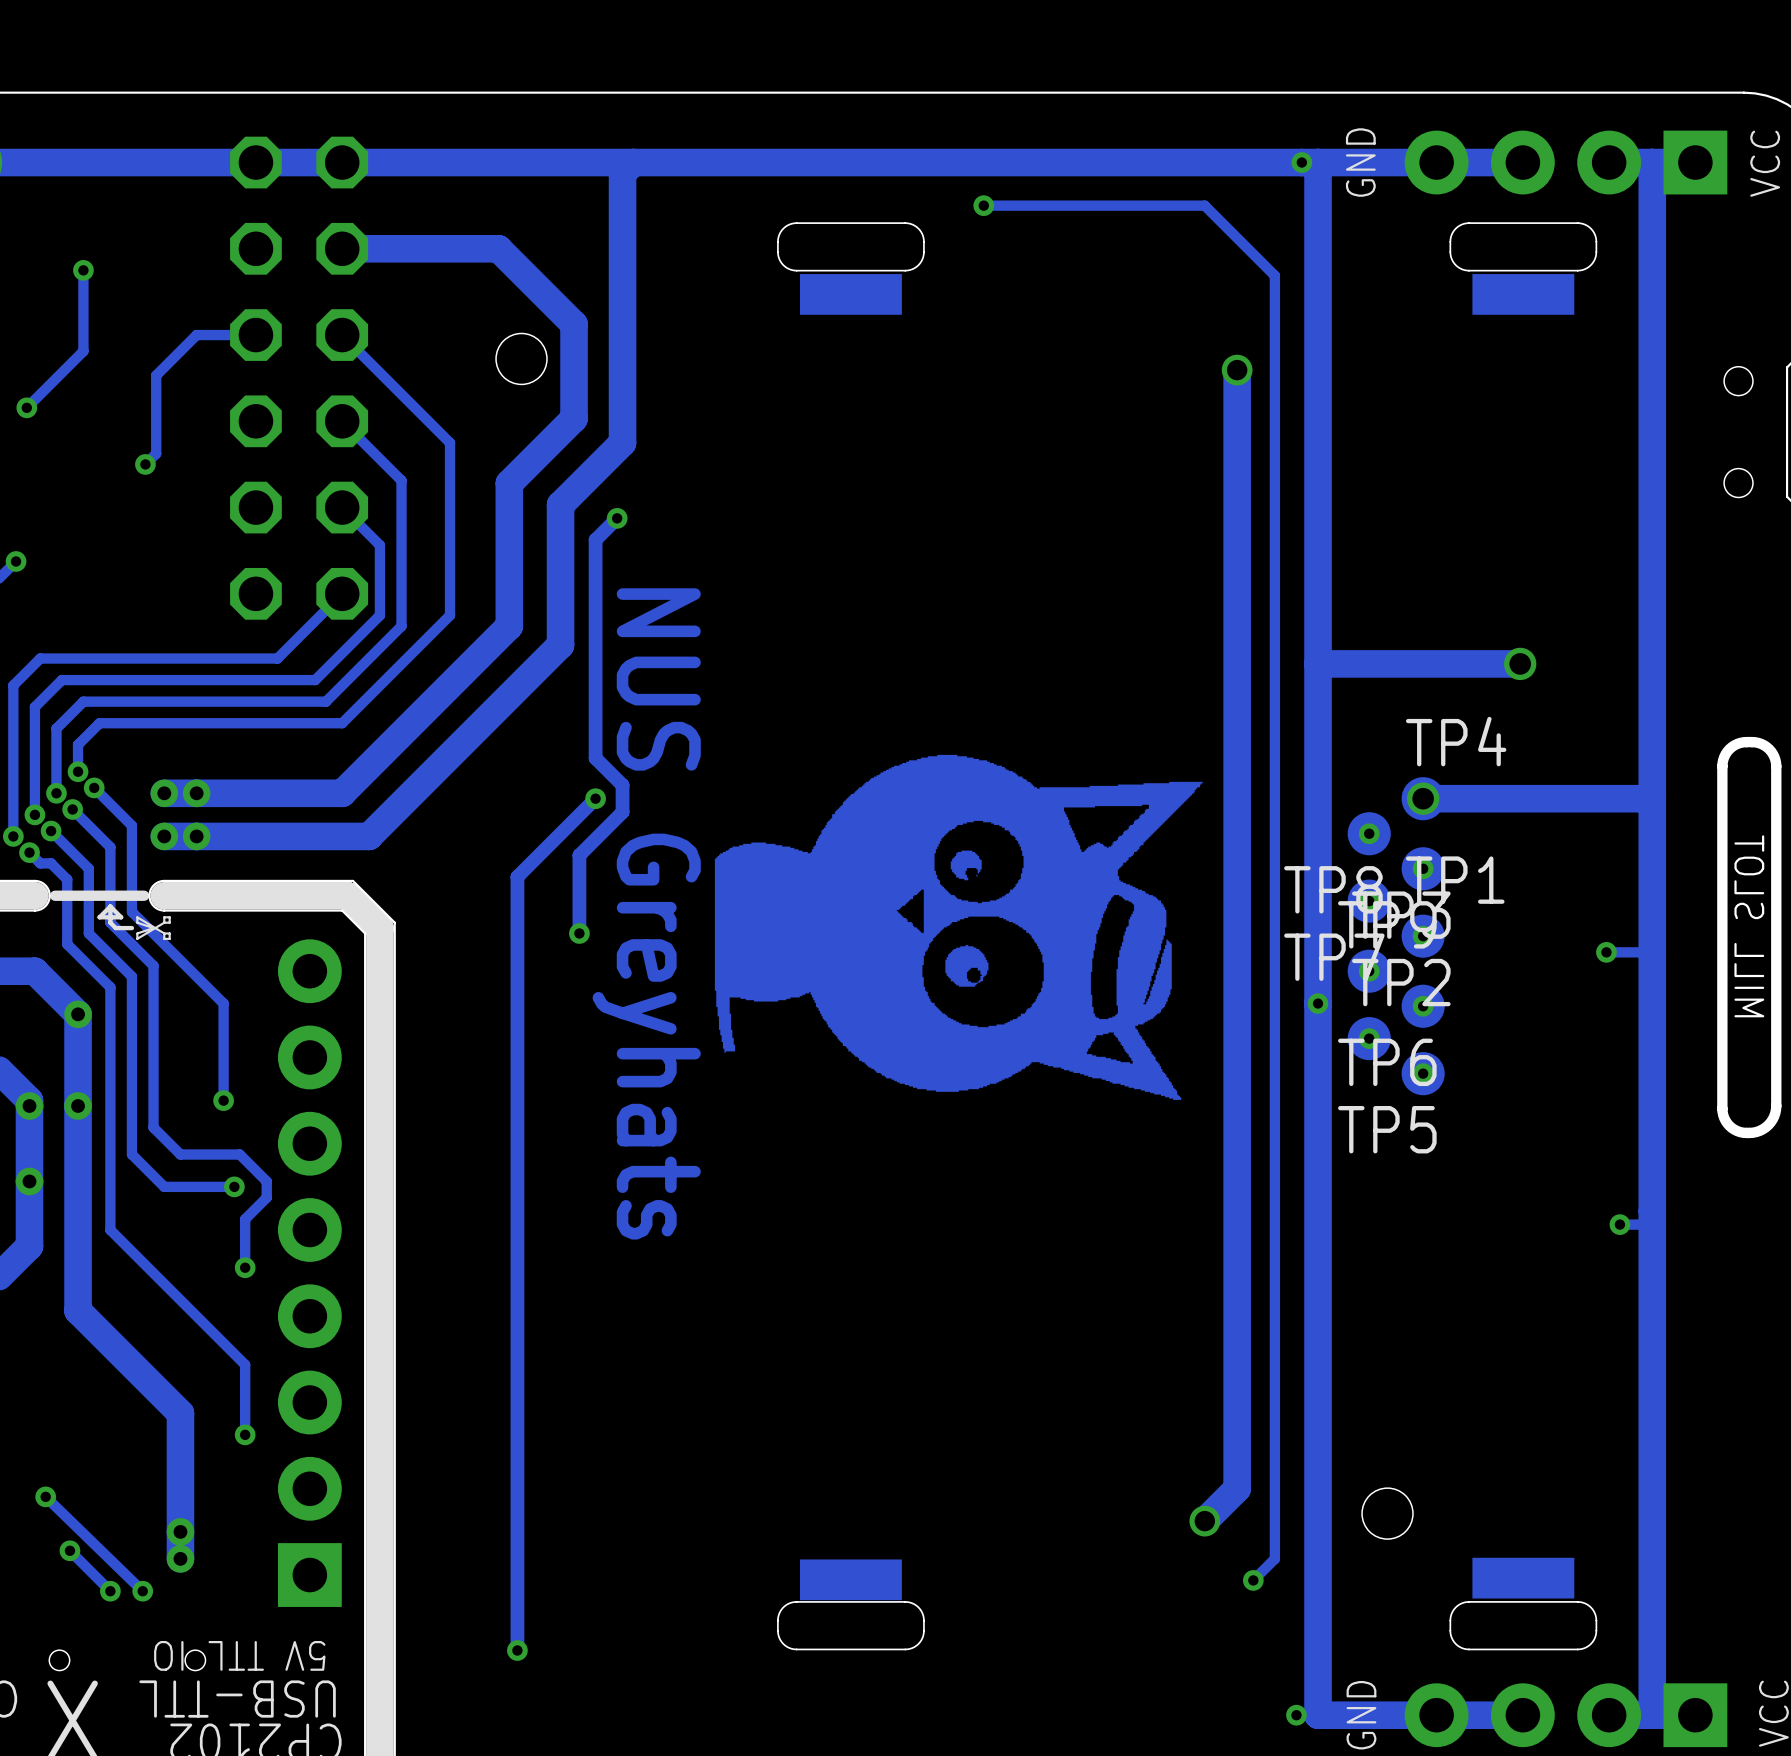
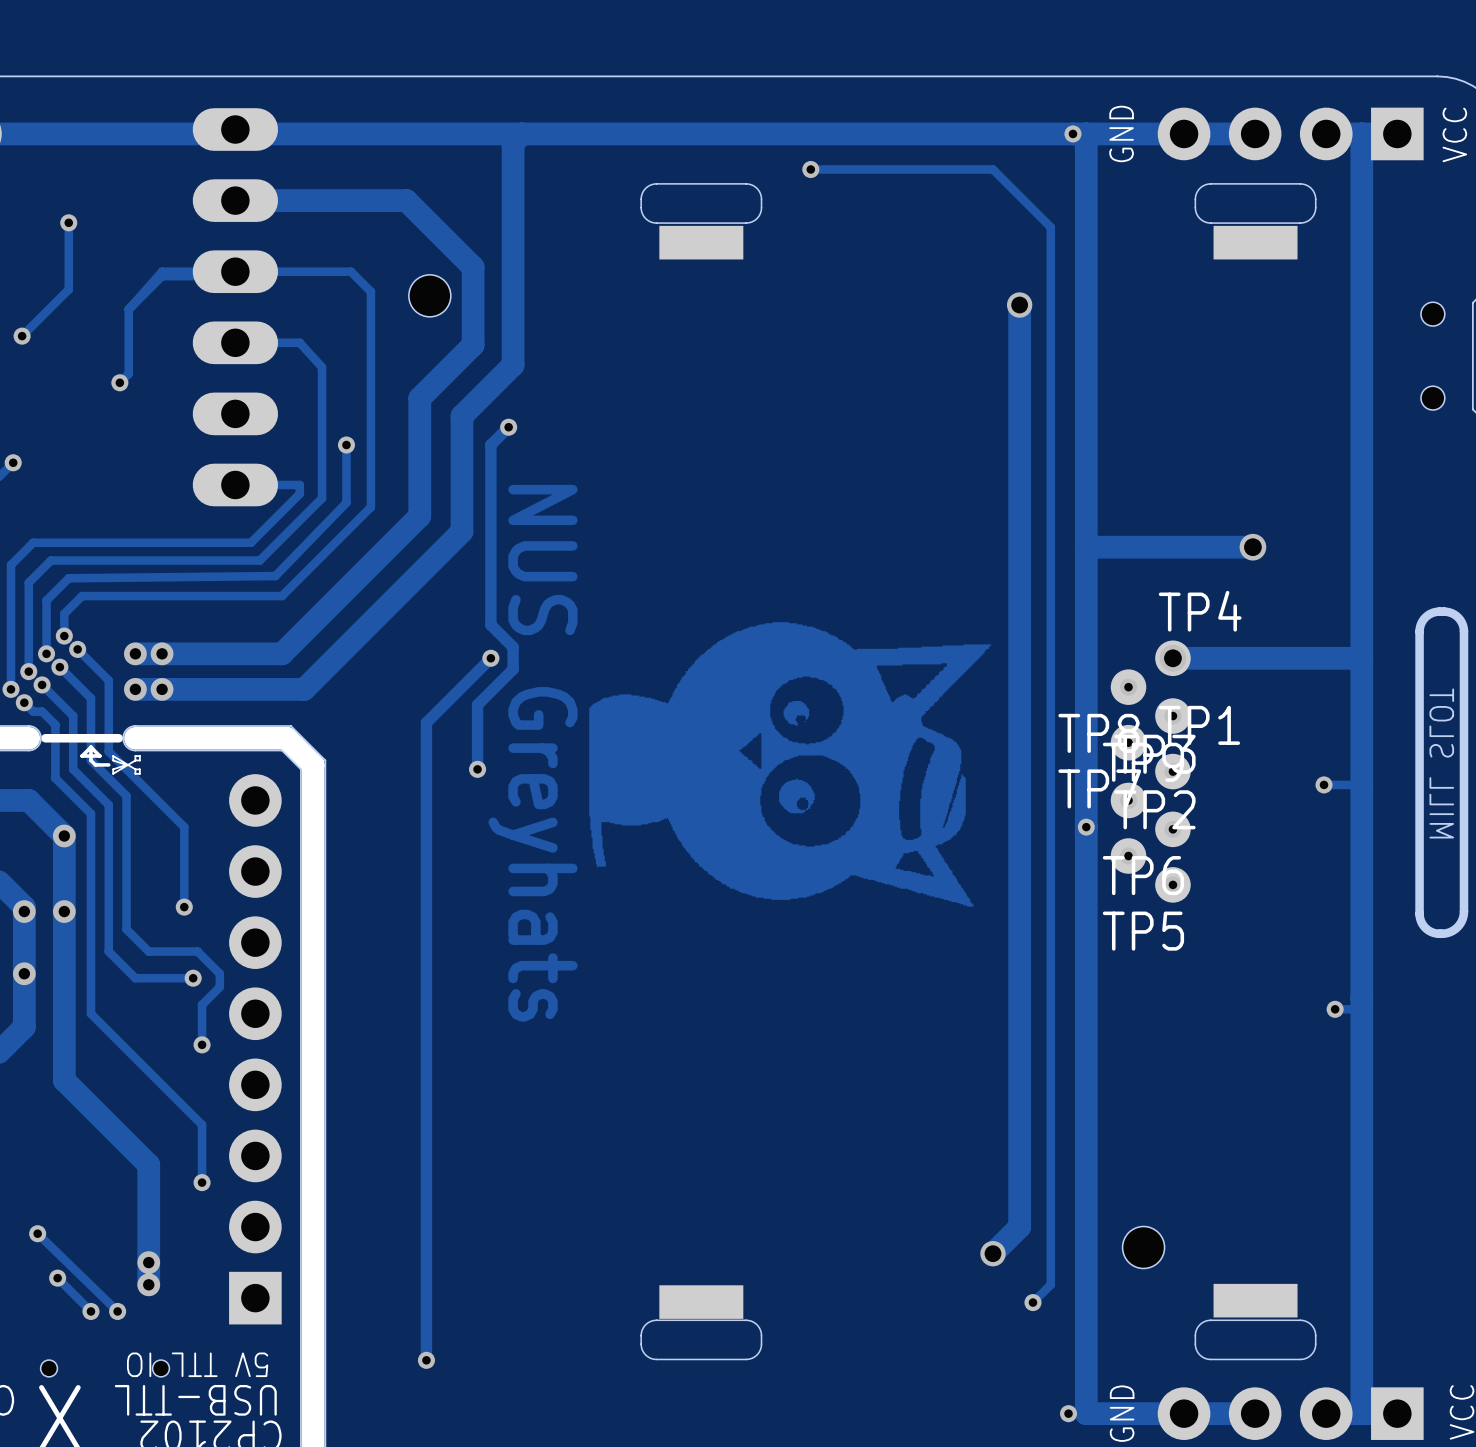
part footprint: [230, 136, 369, 620] -> [192, 108, 279, 507]
track: (498, 248) (342, 248) -> (410, 205) (406, 200) (235, 200)
track: (342, 335) (450, 442) -> (128, 309) (162, 271) (350, 271) (370, 291) (370, 365)
track: (342, 421) (401, 480) (401, 626) (326, 701) (83, 701) -> (346, 445) (346, 502) (275, 576) (68, 578)
track: (342, 507) (379, 545) (379, 615) -> (235, 342) (299, 342) (322, 367) (322, 498) (313, 507)
via: none -> (346, 445)
track: (342, 593) (277, 658) -> (235, 484) (299, 484) (299, 493) (250, 542) (228, 542)

